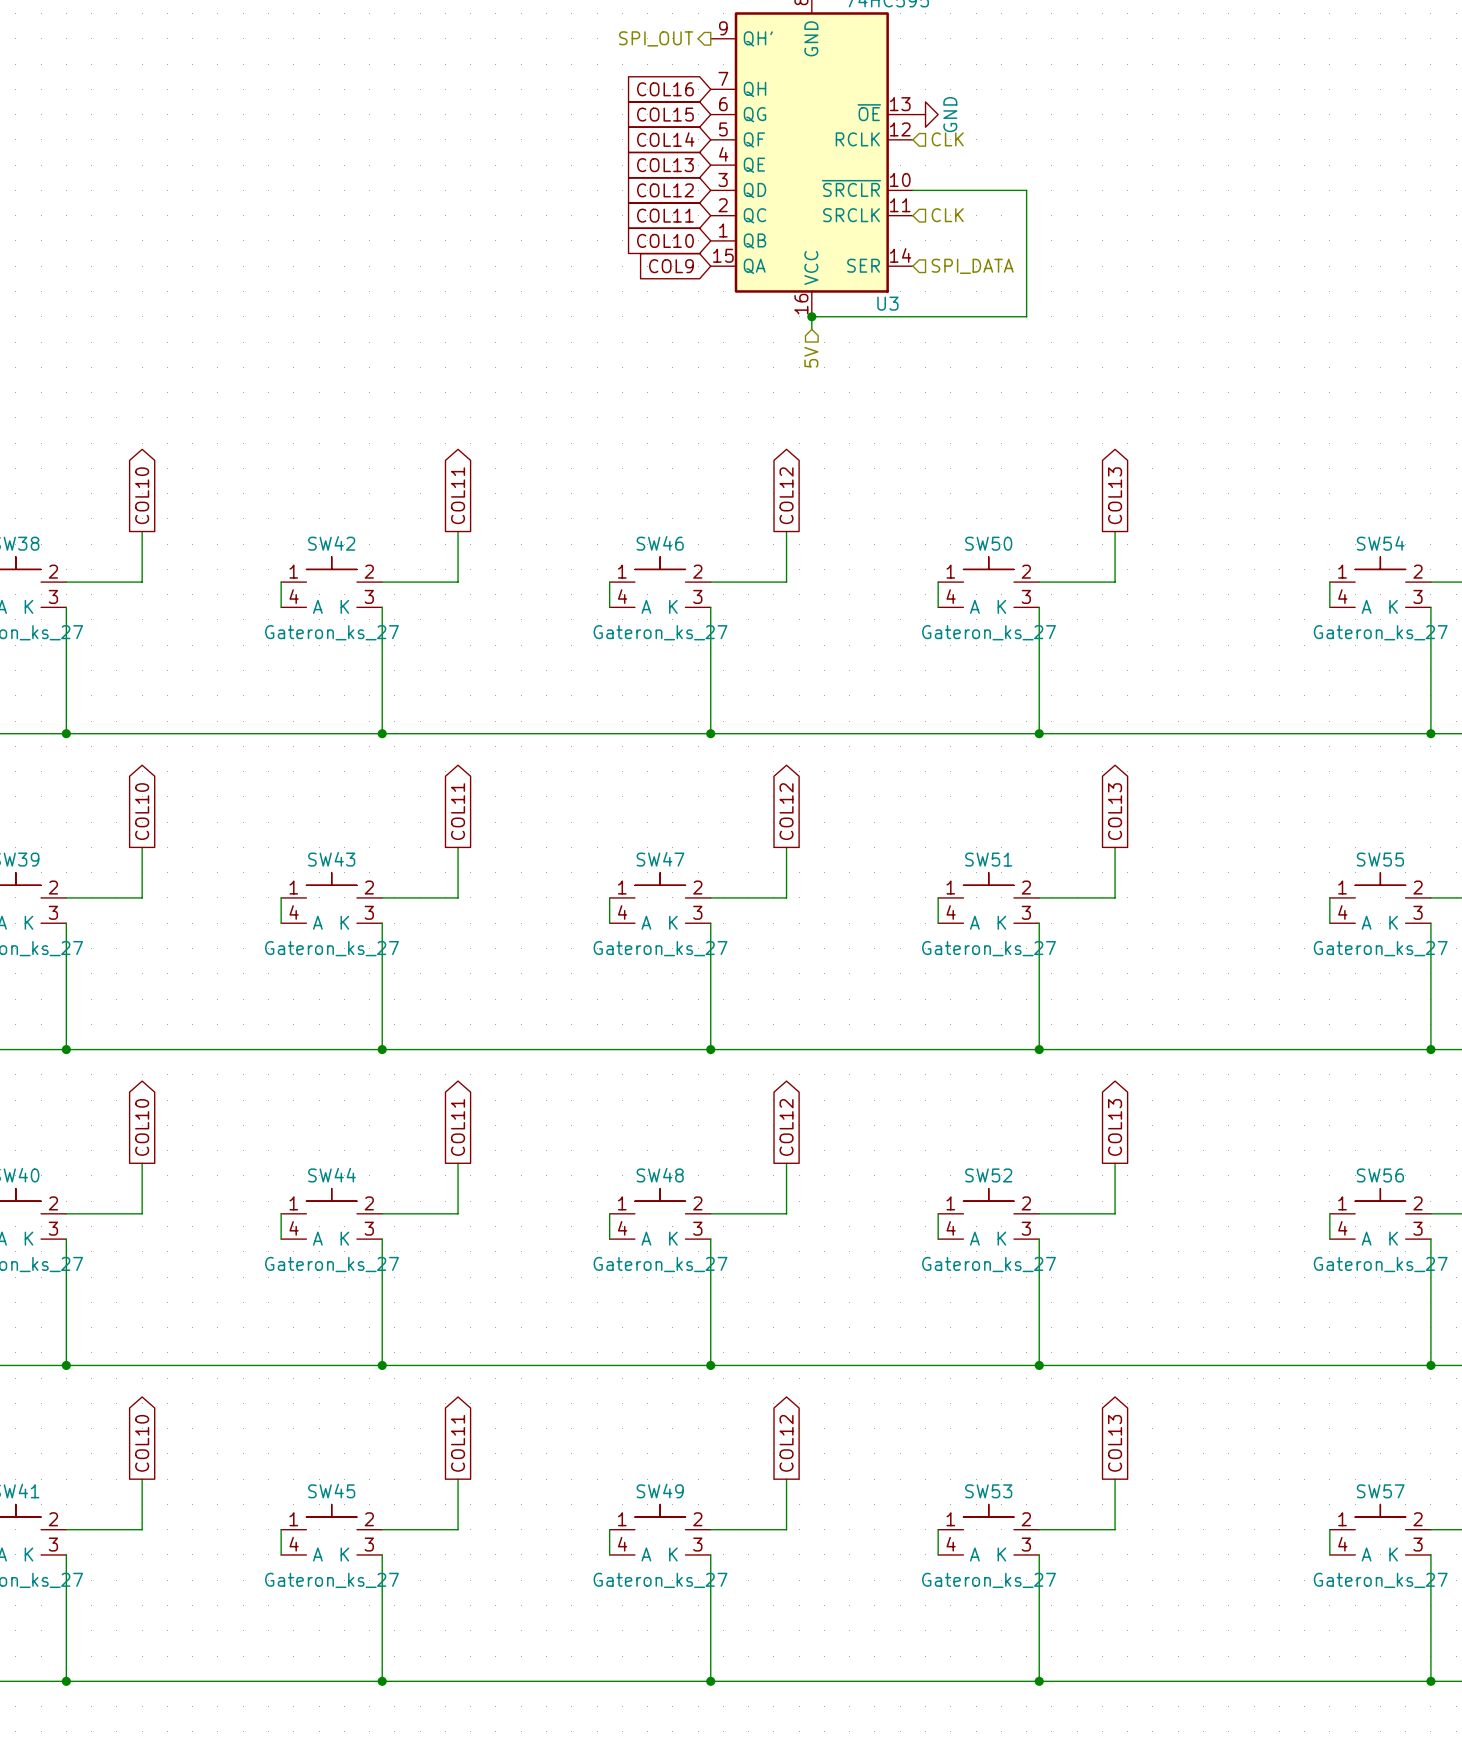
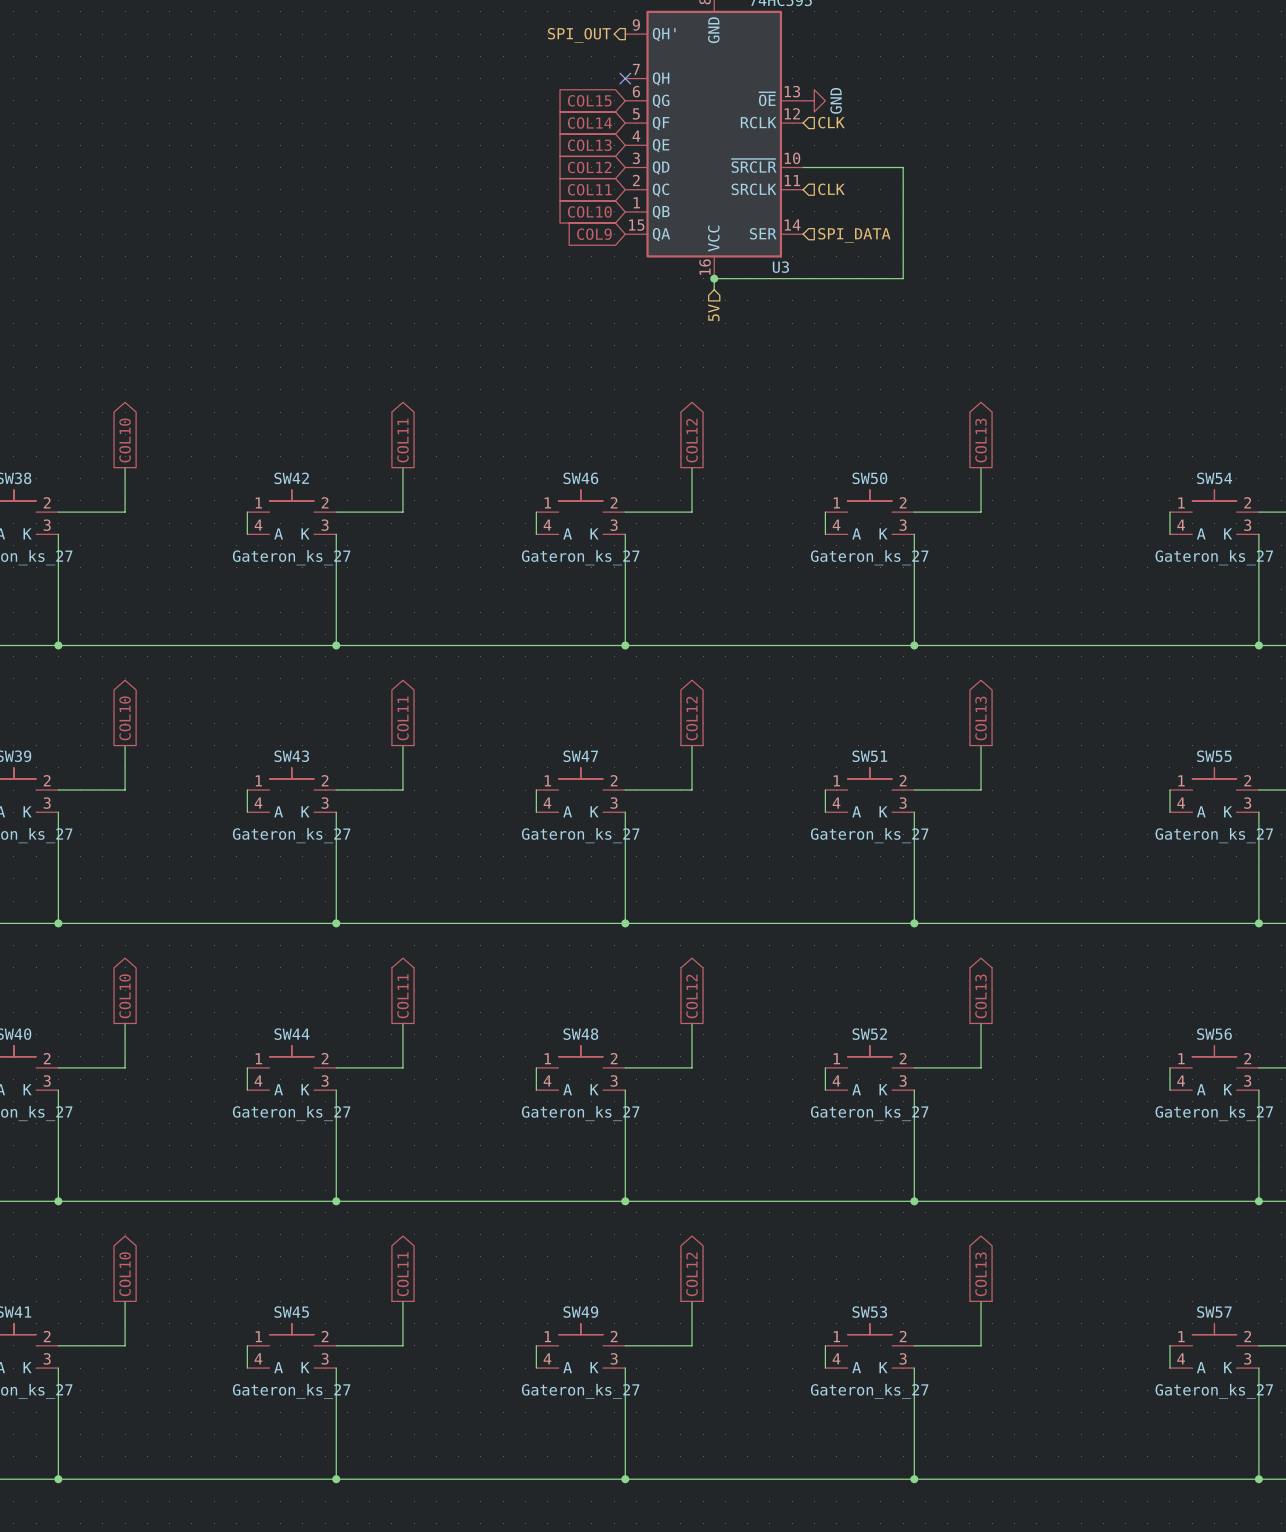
global label: COL16 (665, 89) -> none
no-connect mark: none -> (625, 78)

